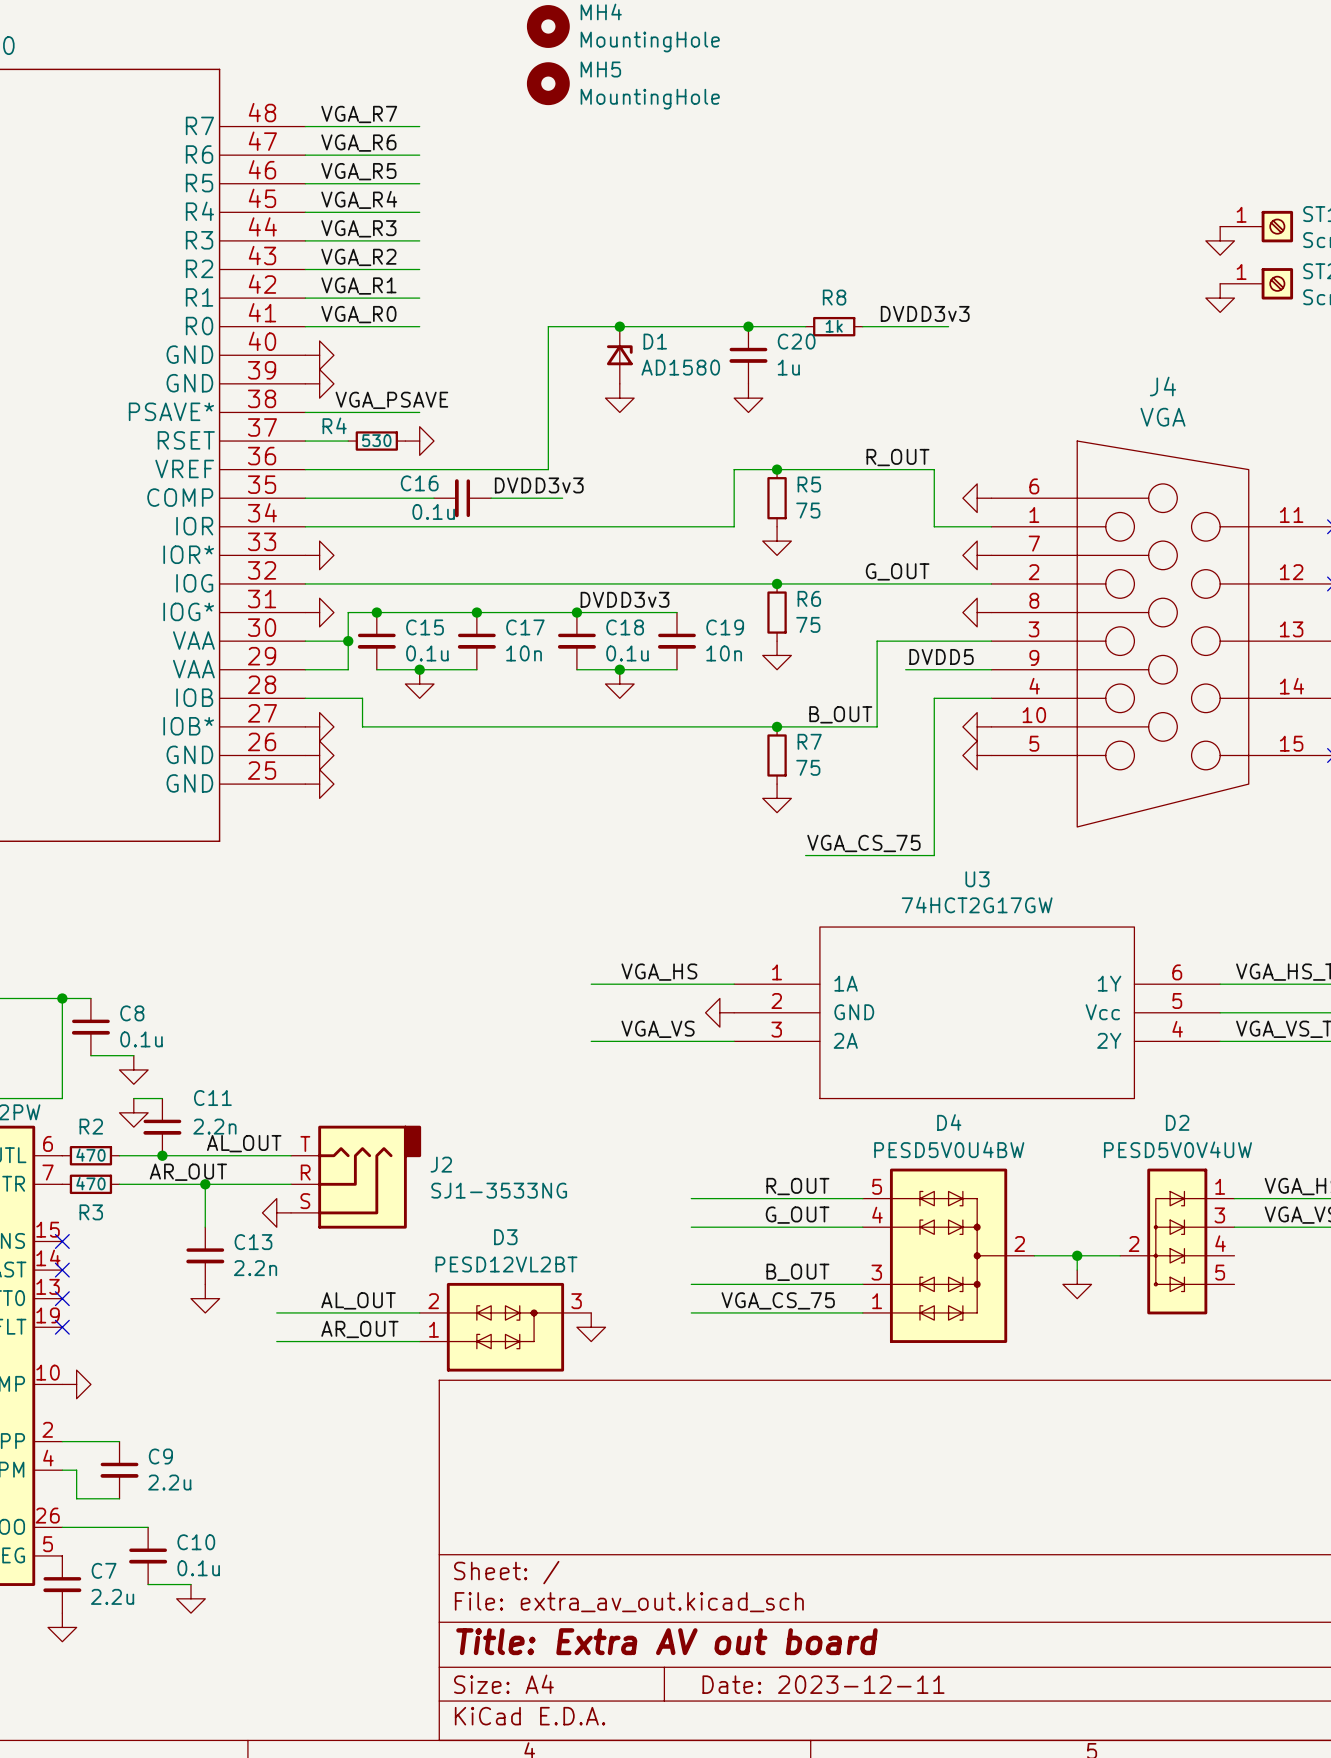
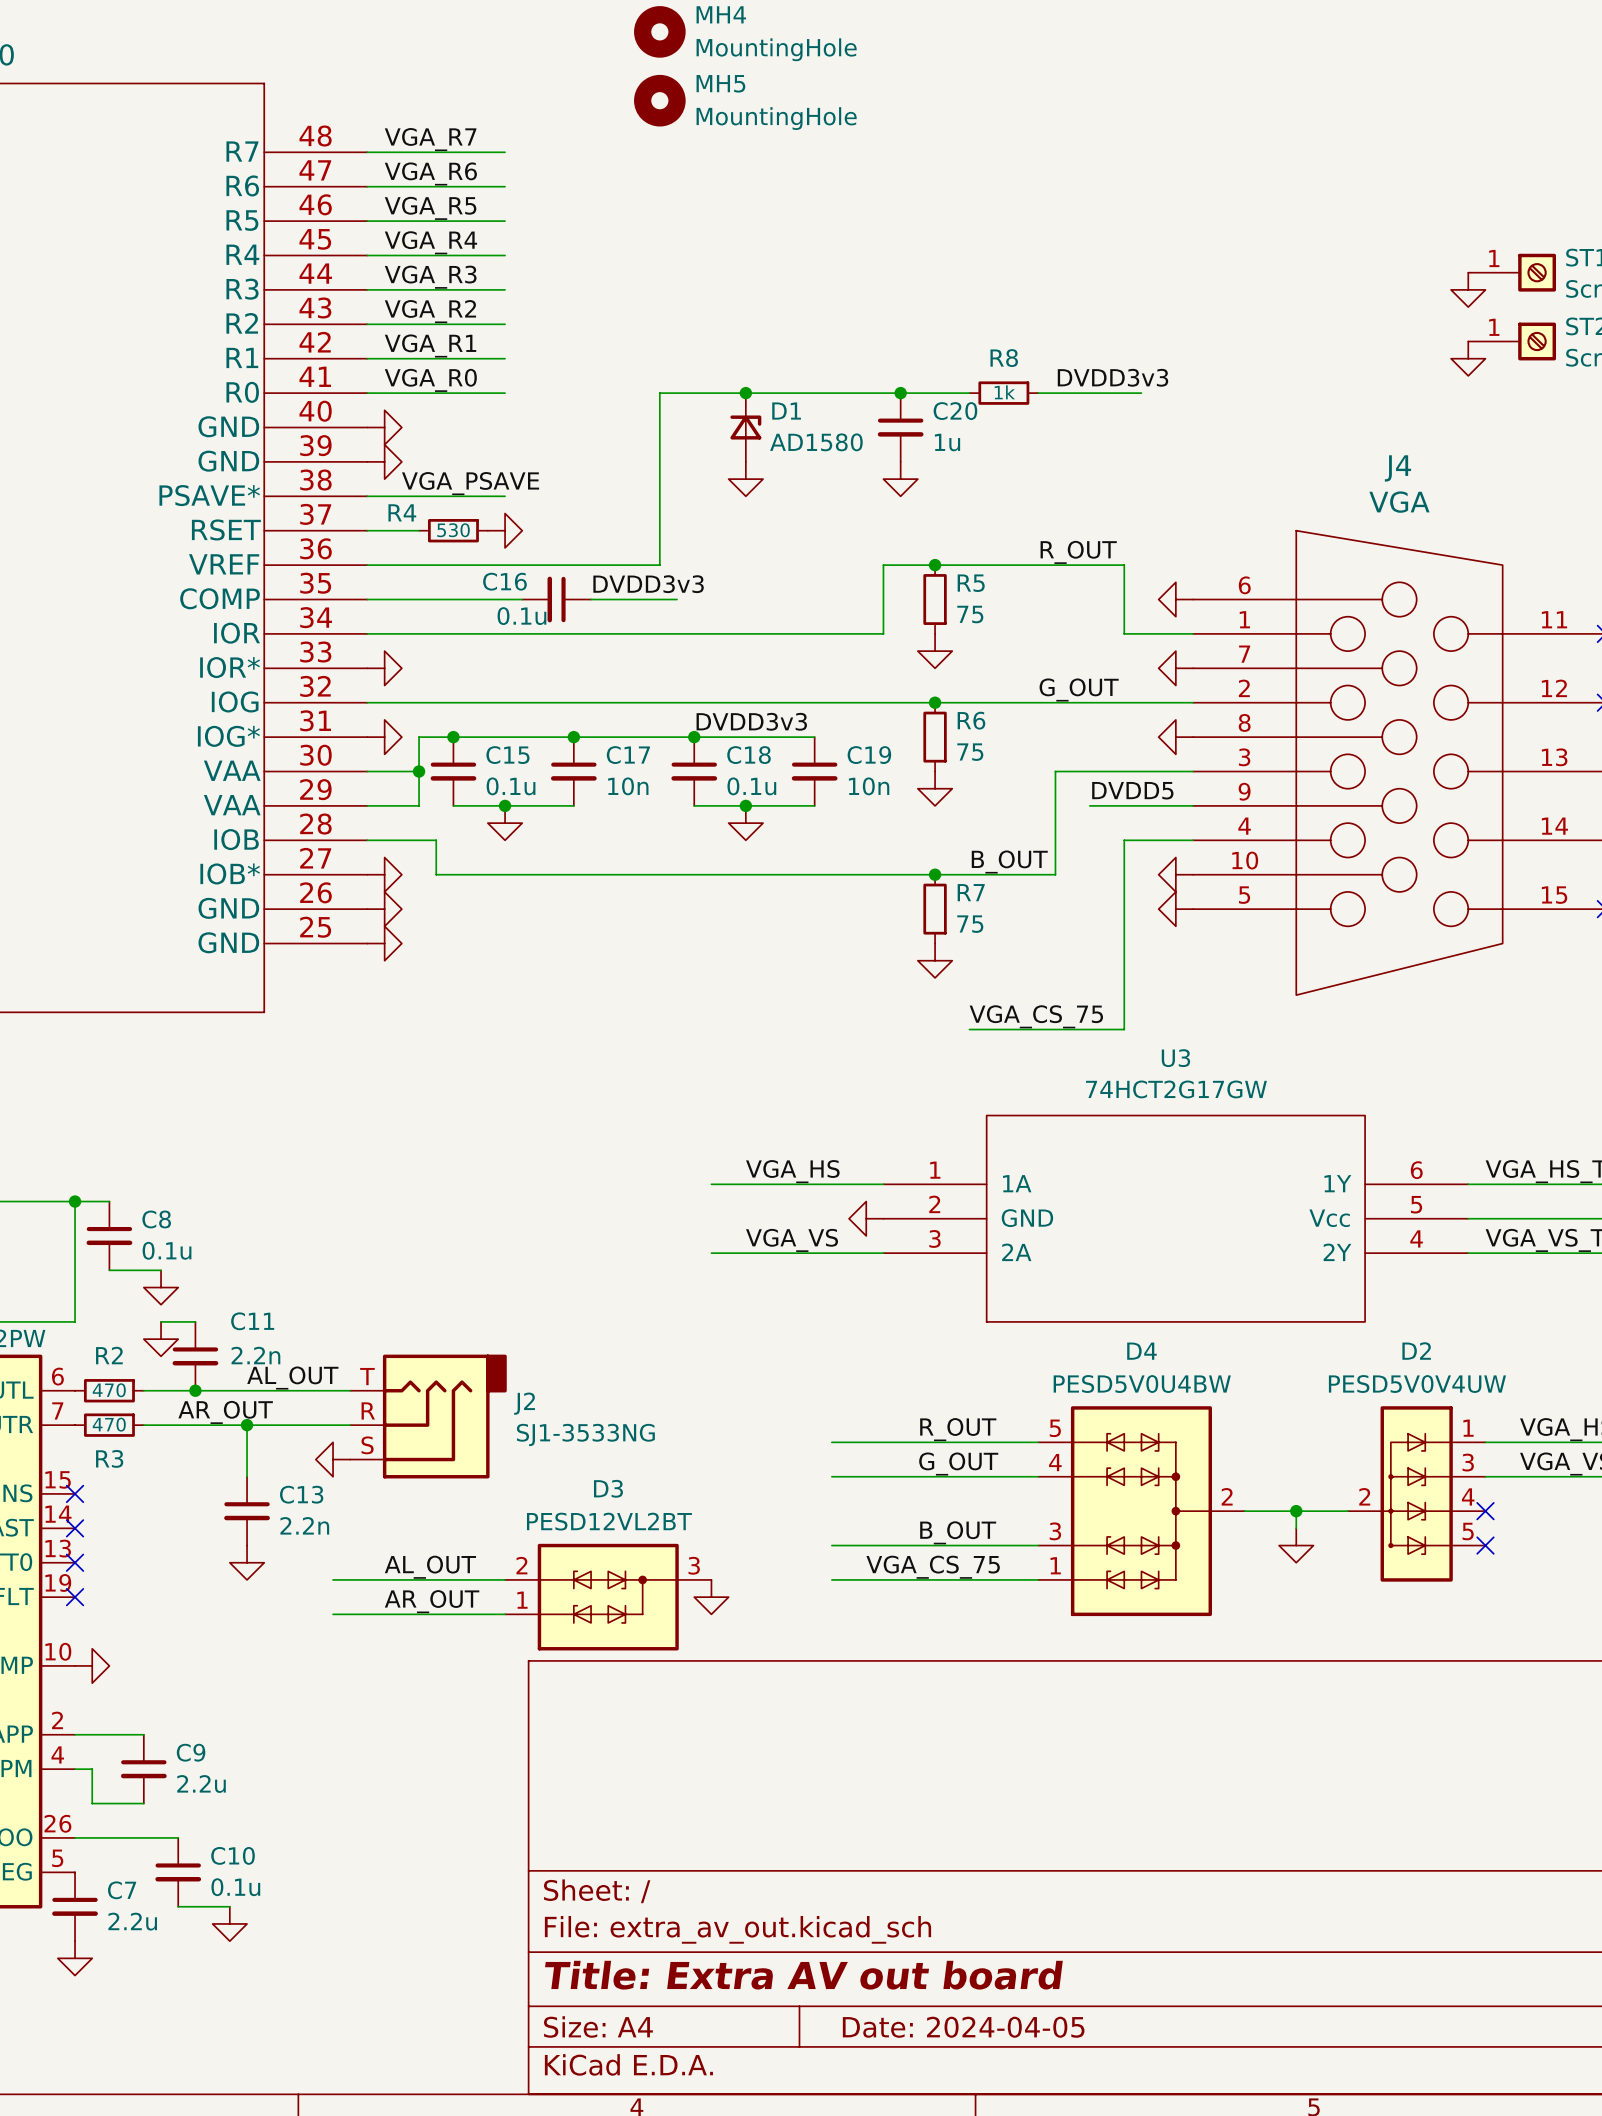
no-connect mark: none -> (1485, 1511)
no-connect mark: none -> (1485, 1545)
title block: Date: 2023-12-11 (823, 1684) -> Date: 2024-04-05 (963, 2027)

